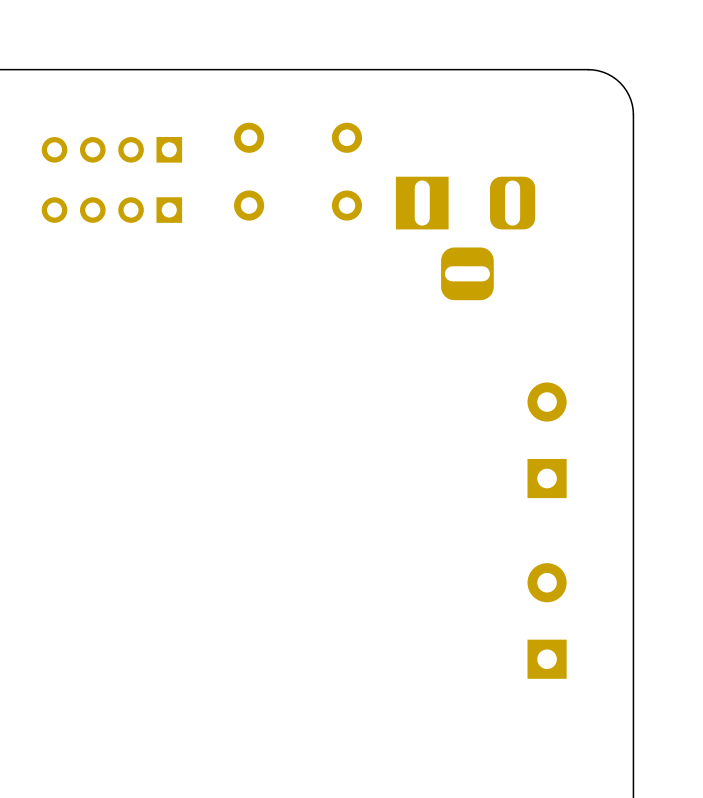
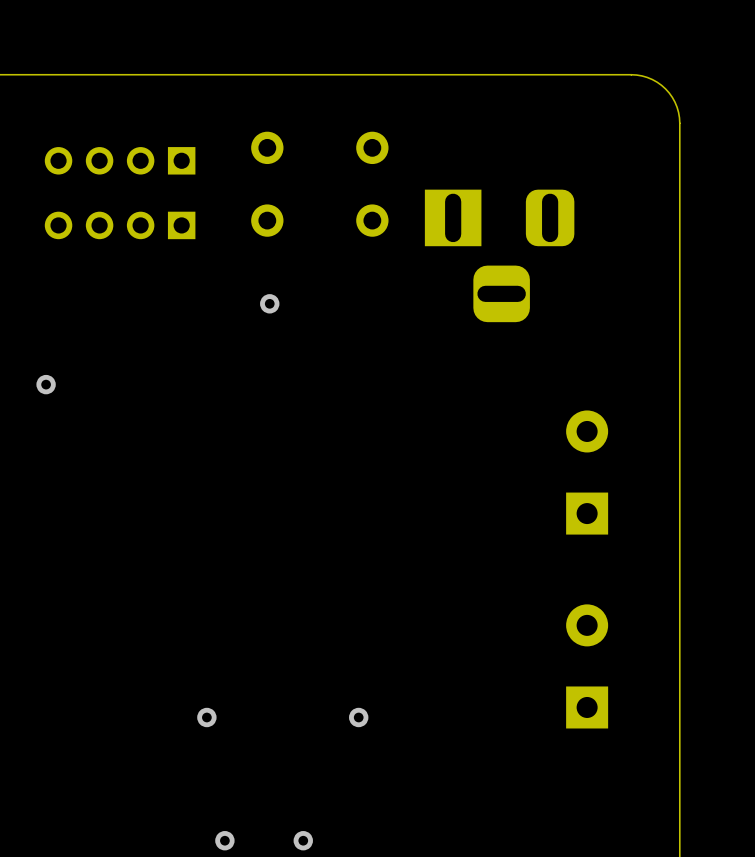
via: none -> (269, 303)
via: none -> (46, 384)
via: none -> (206, 717)
via: none -> (358, 717)
via: none -> (224, 840)
via: none -> (303, 840)

